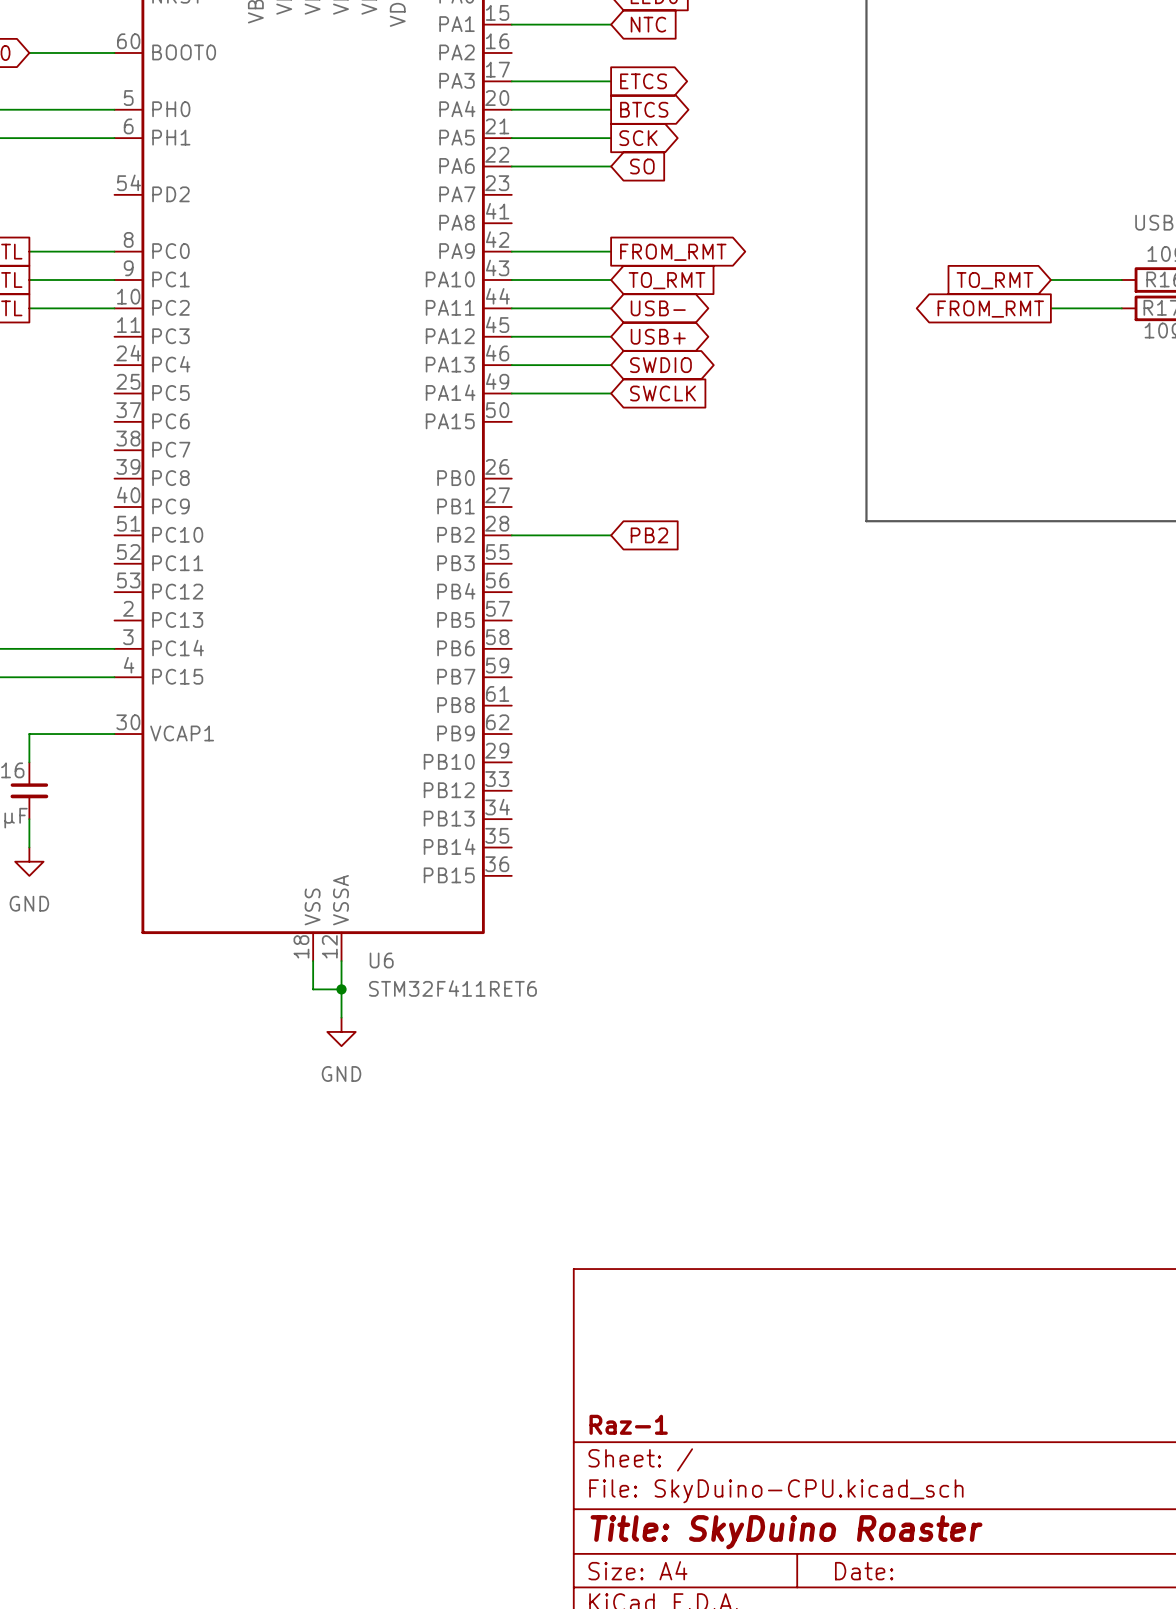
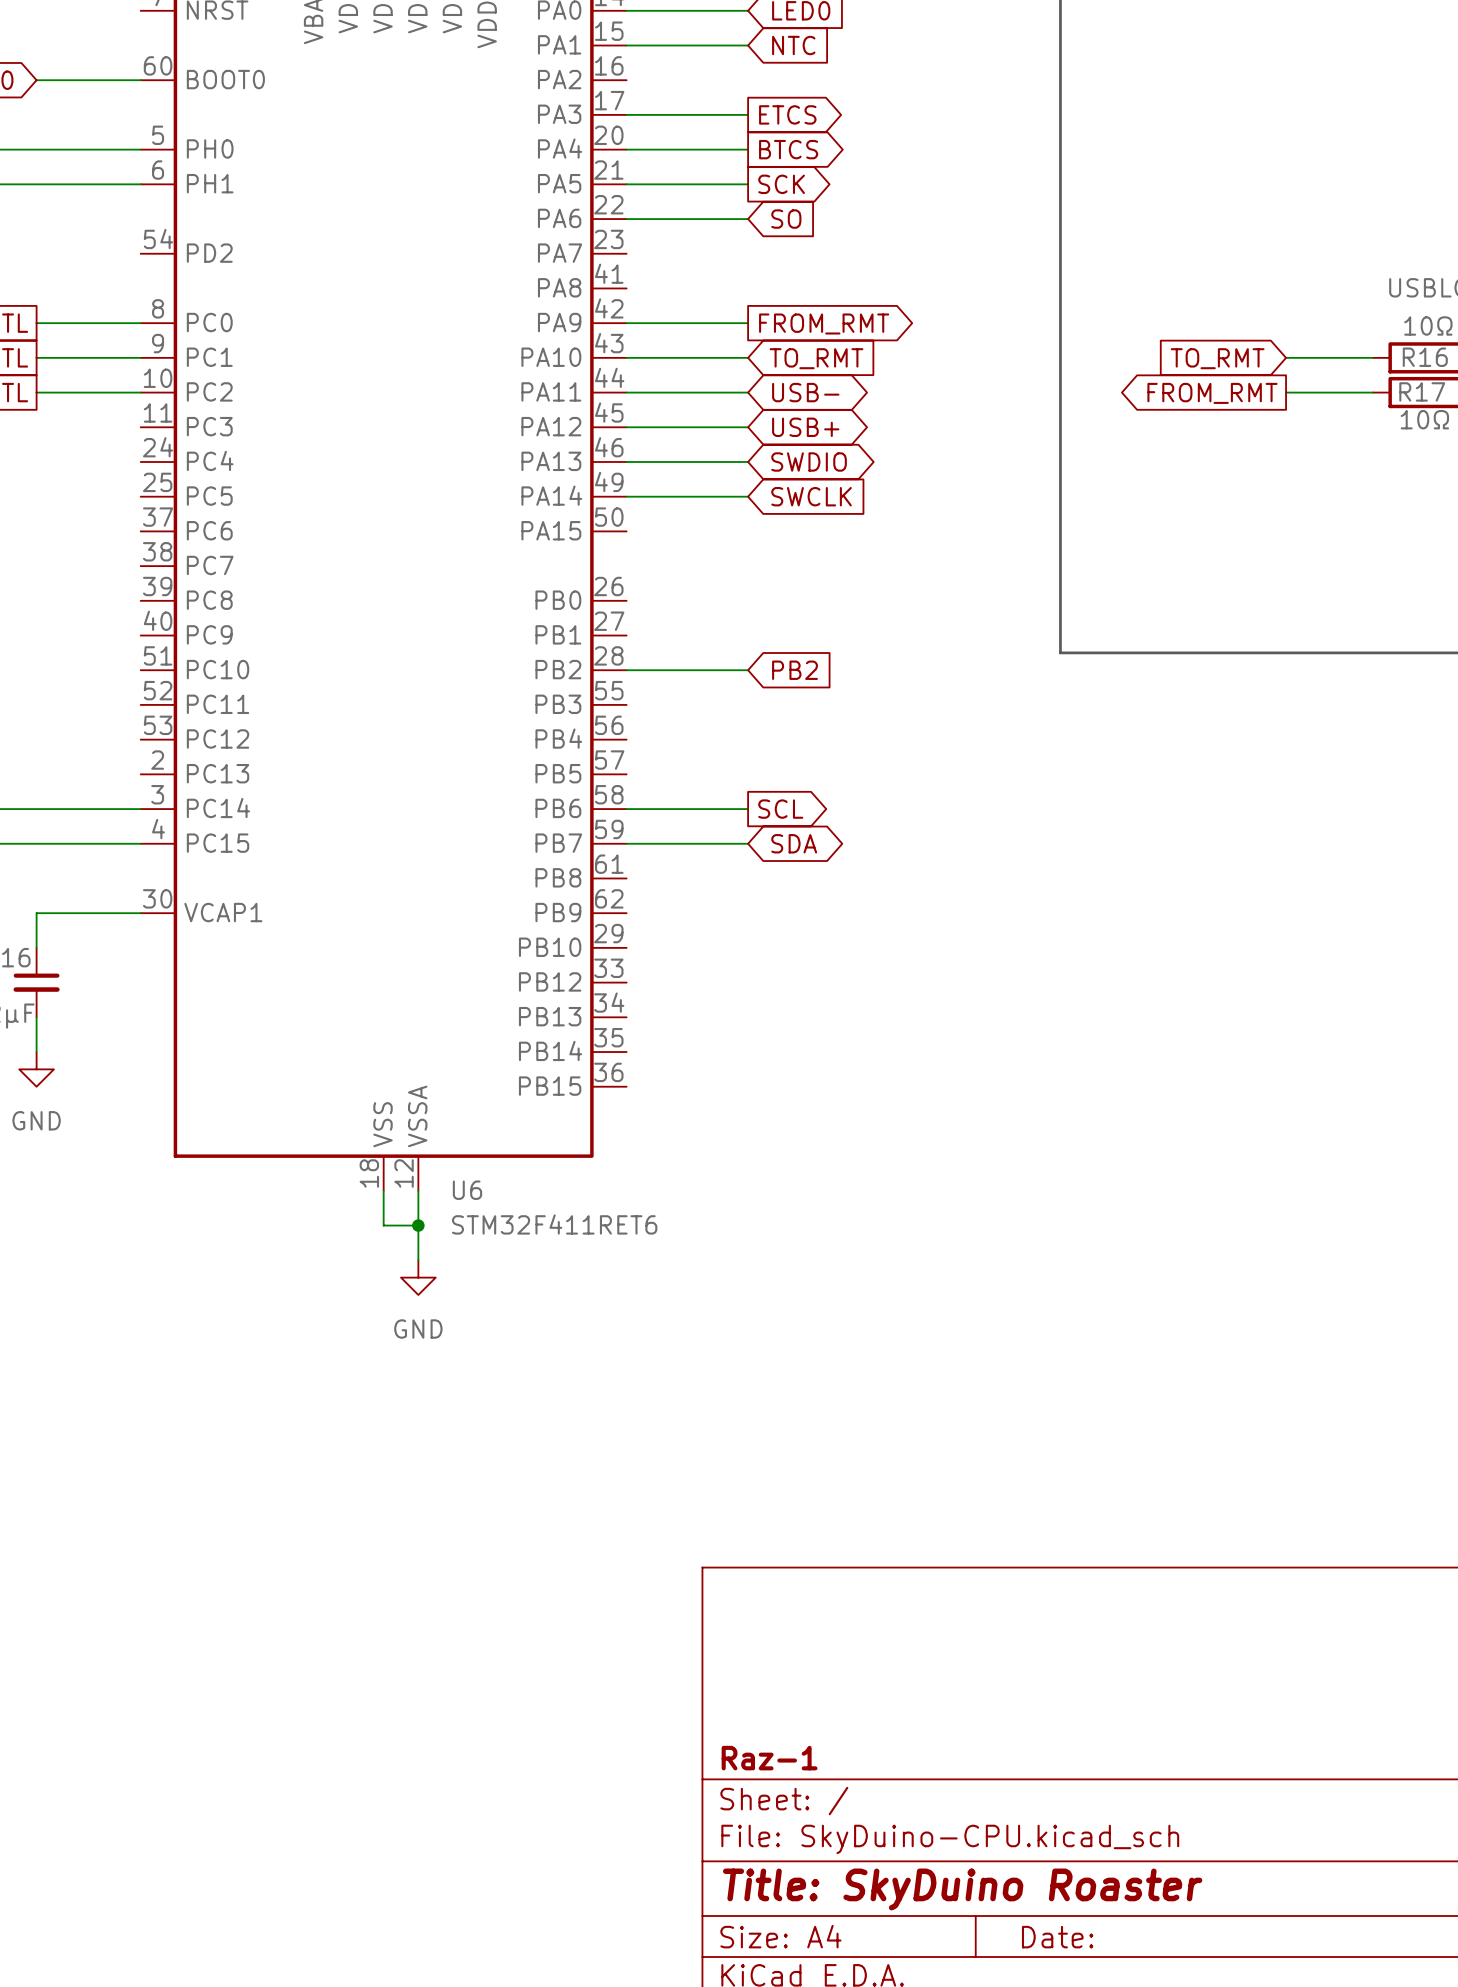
wire: none -> (626, 809) (748, 809)
global label: none -> SCL (780, 809)
wire: none -> (626, 843) (748, 843)
global label: none -> SDA (794, 843)

